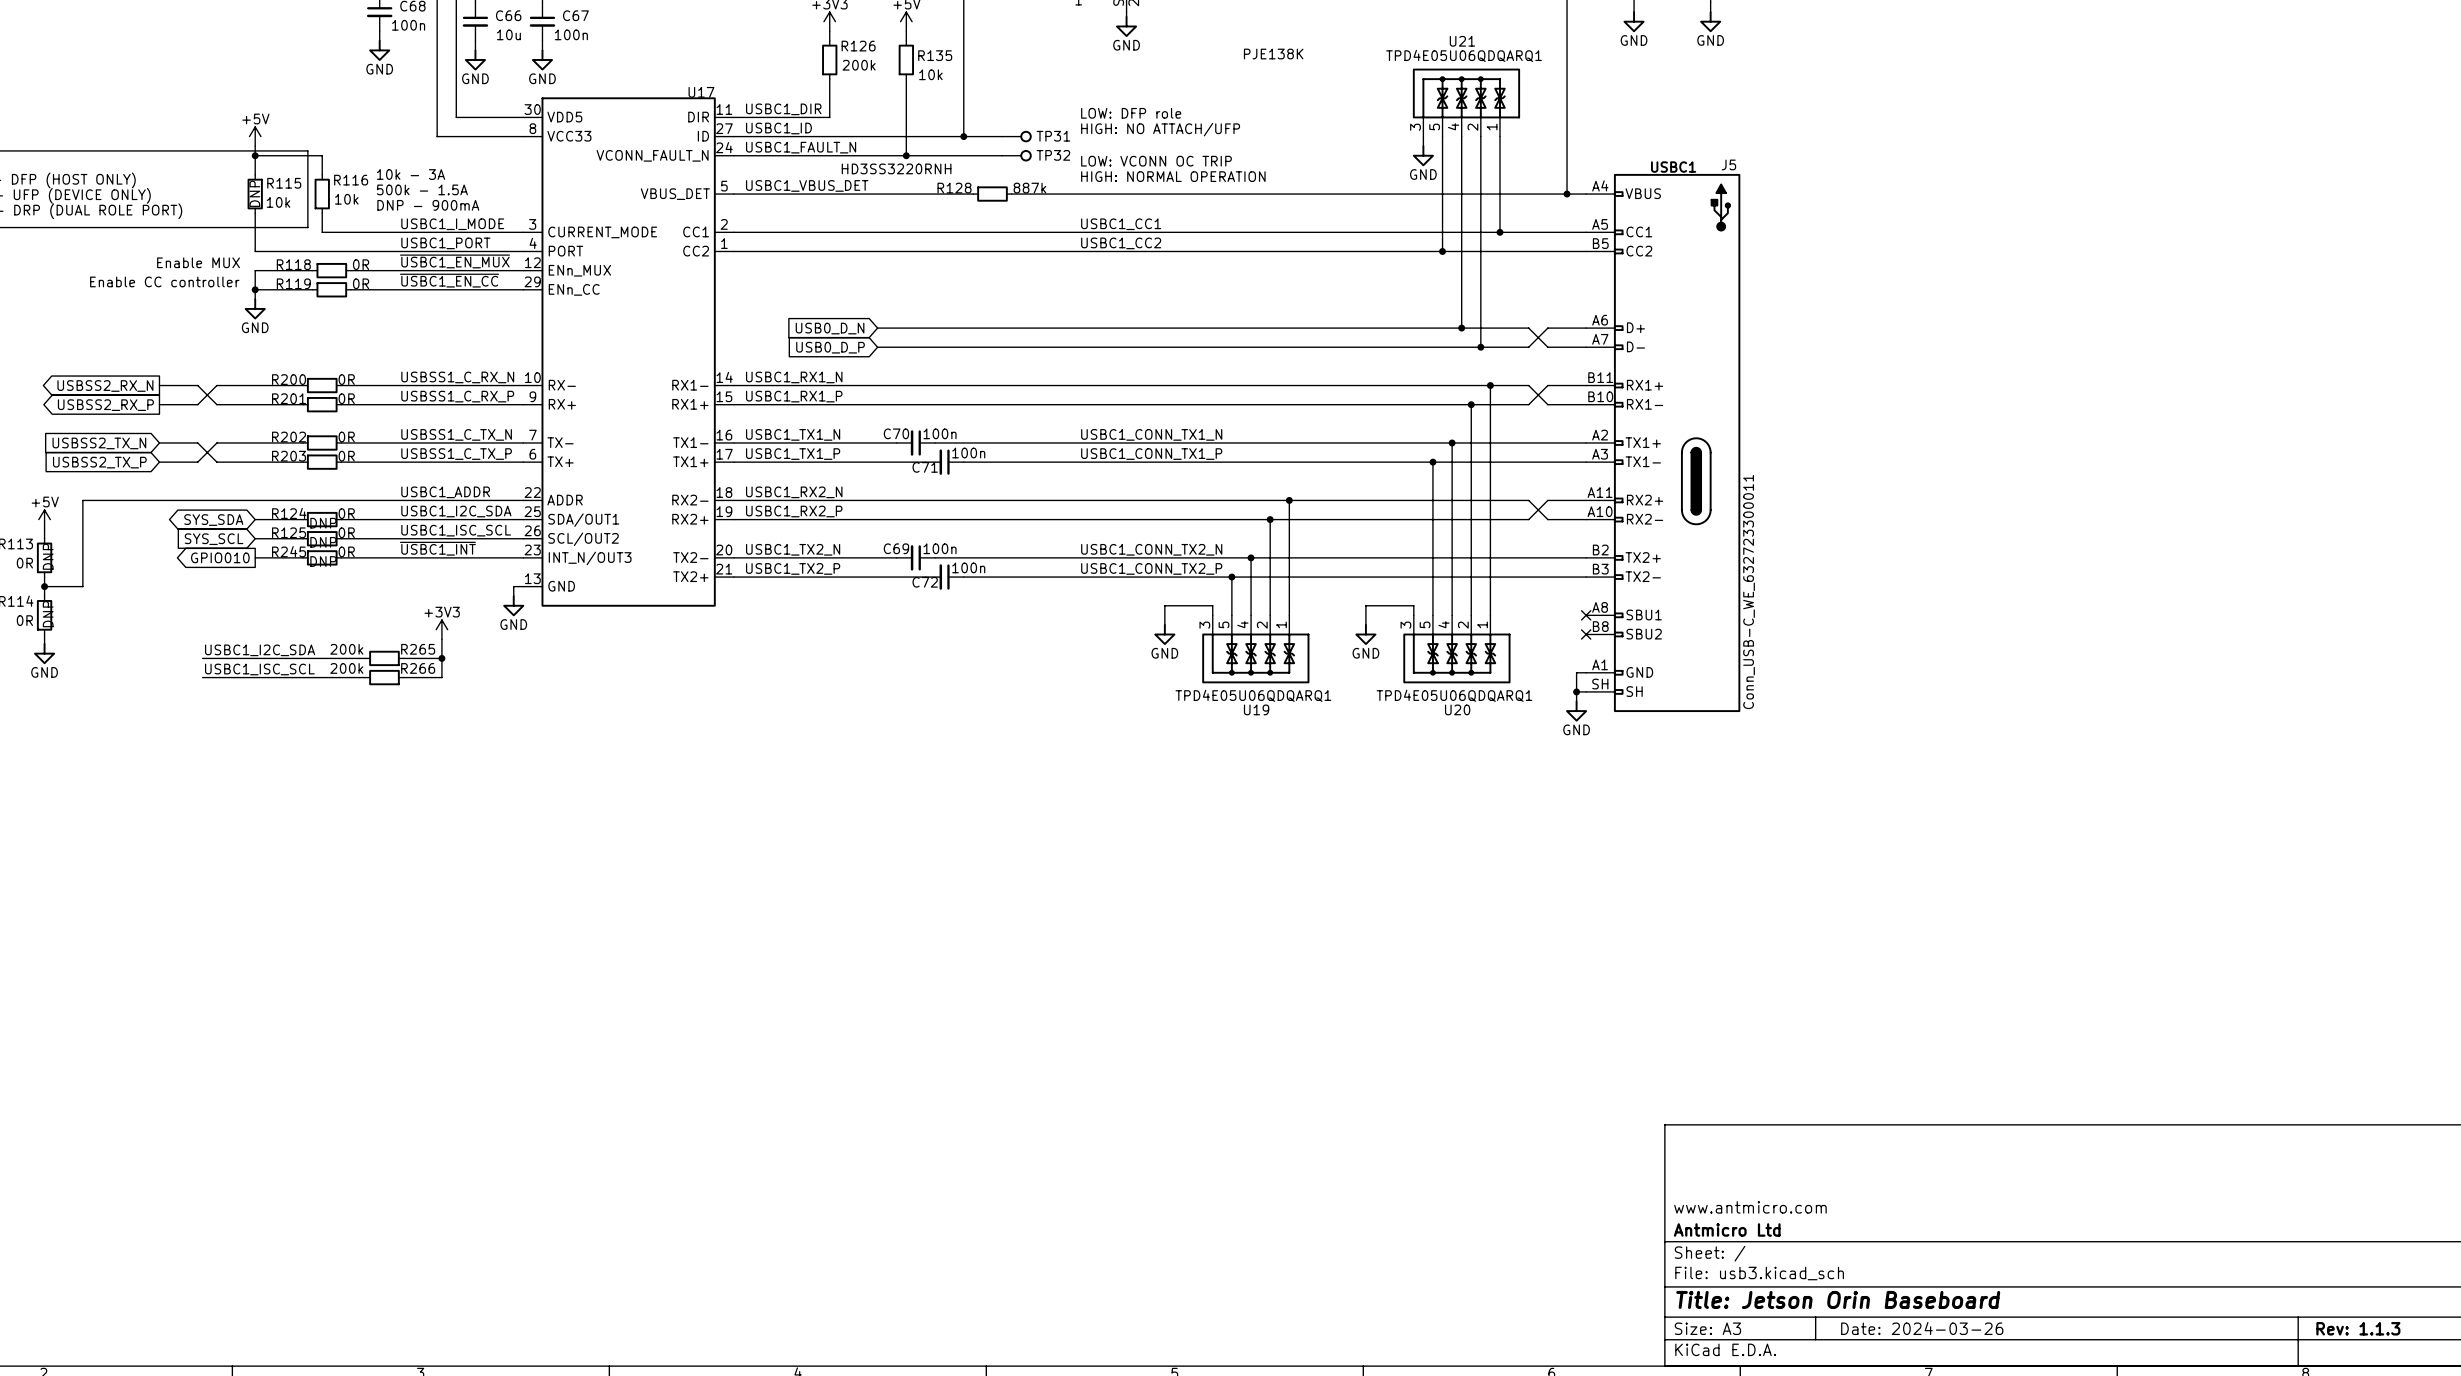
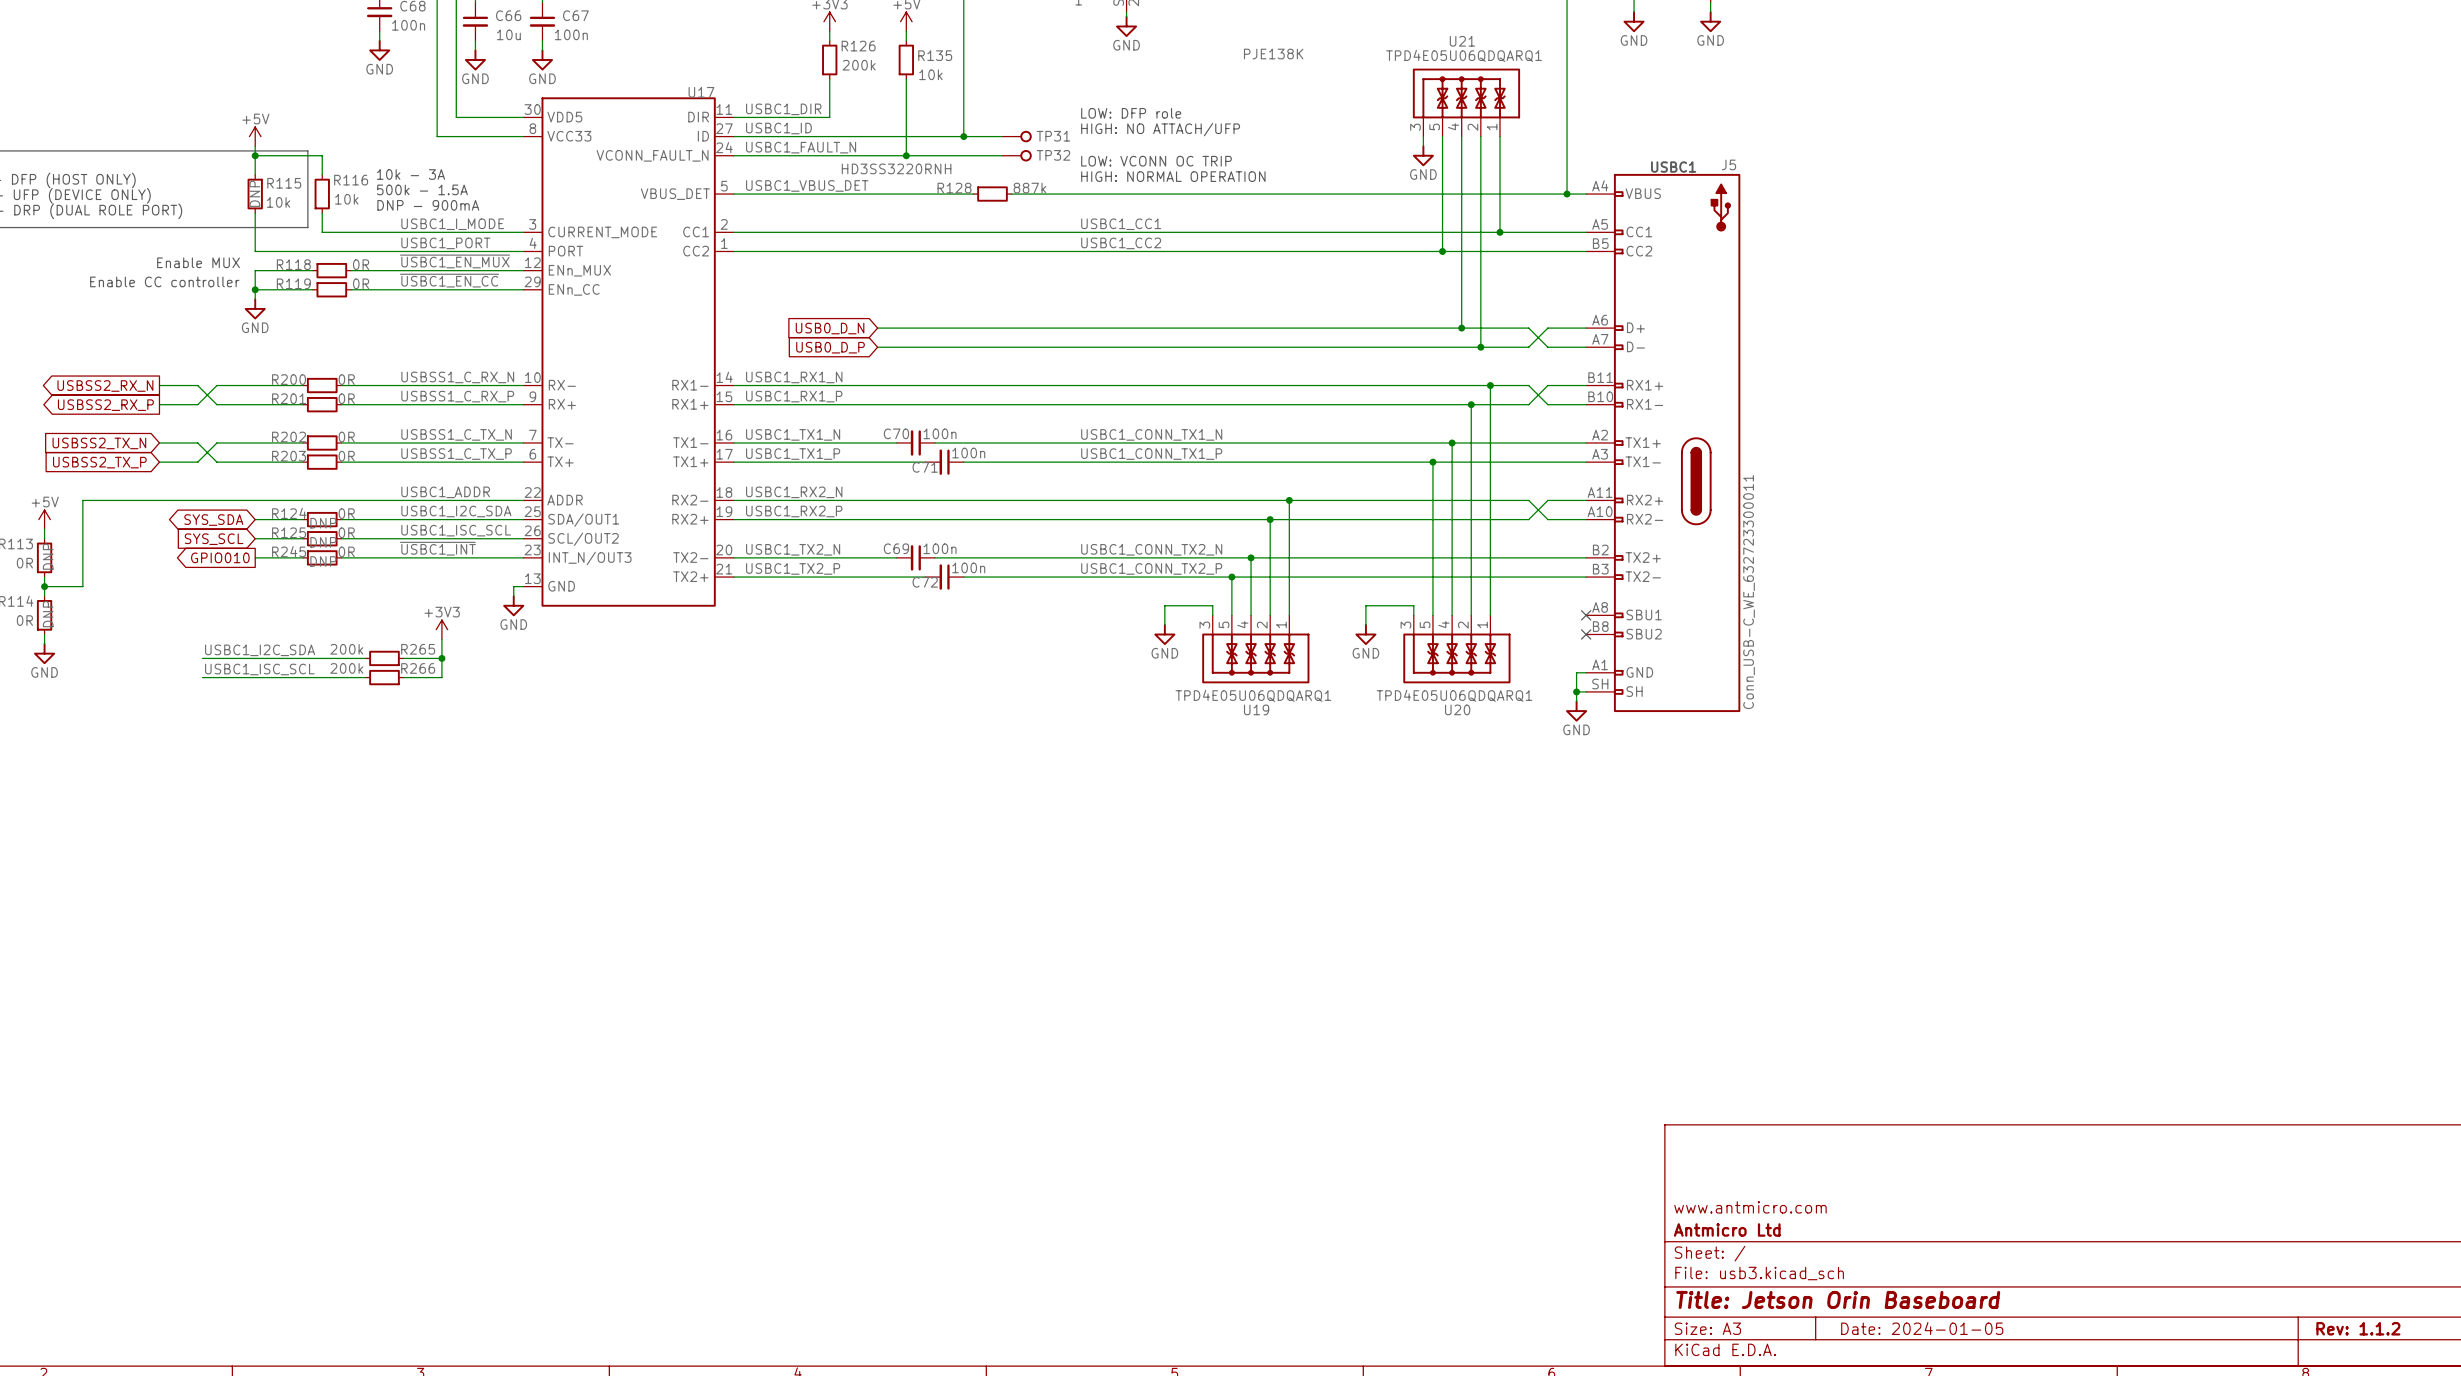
title block: Date: 2024-03-26 (1922, 1328) -> Date: 2024-01-05 (1922, 1328)
title block: Rev: 1.1.3 (2358, 1328) -> Rev: 1.1.2 (2358, 1328)

